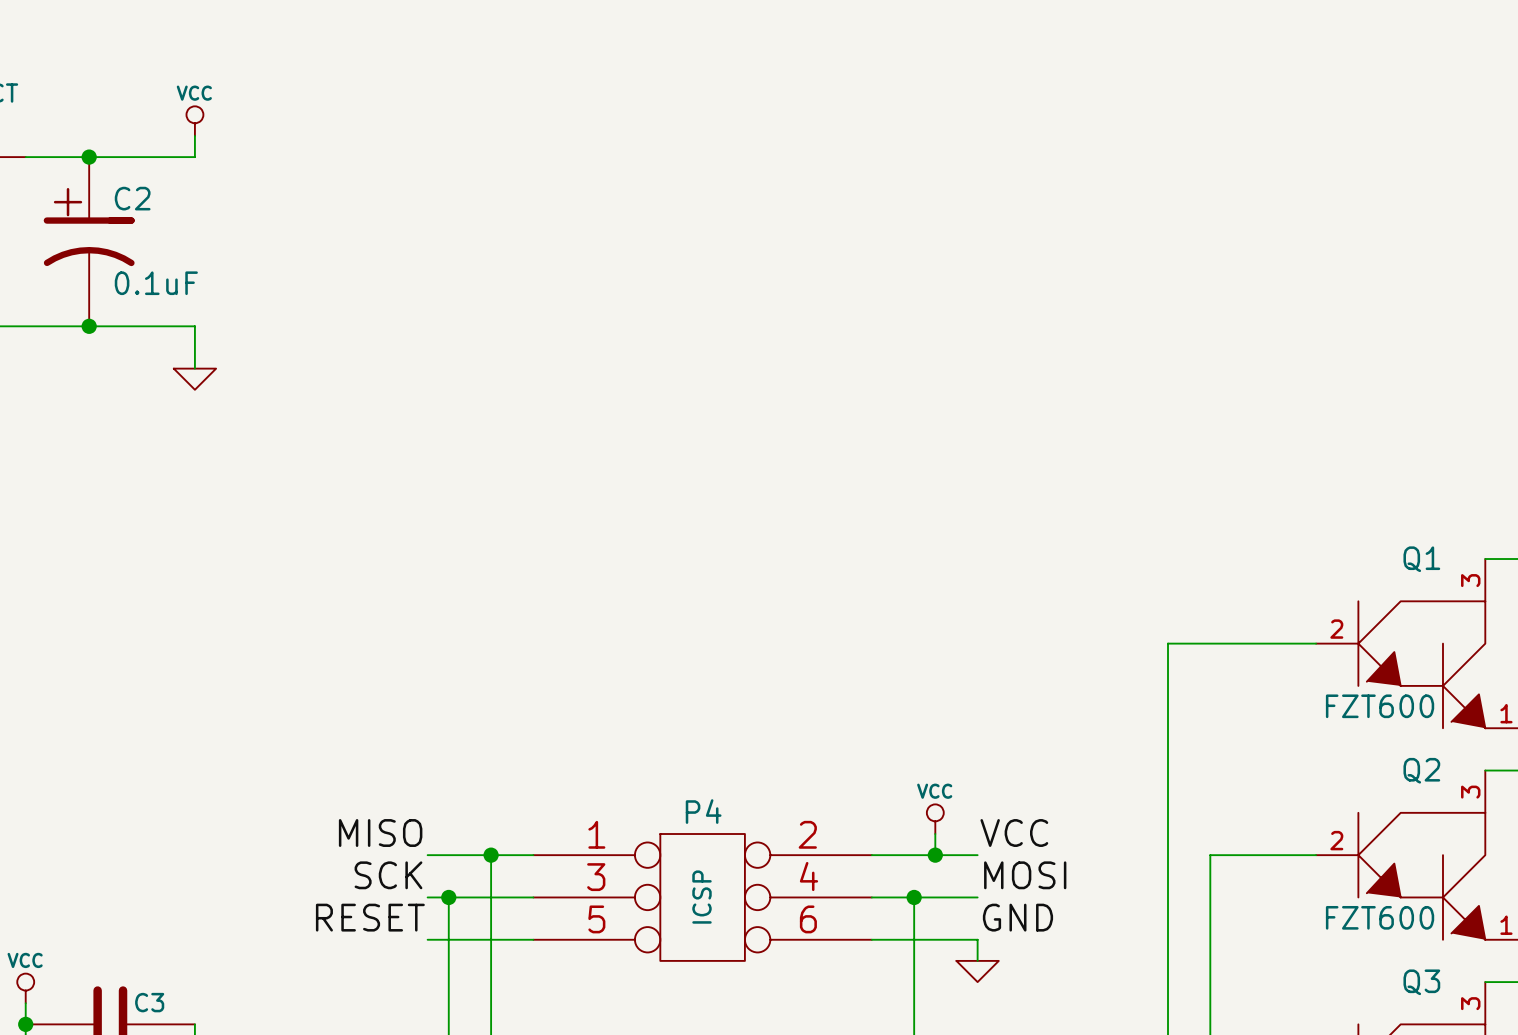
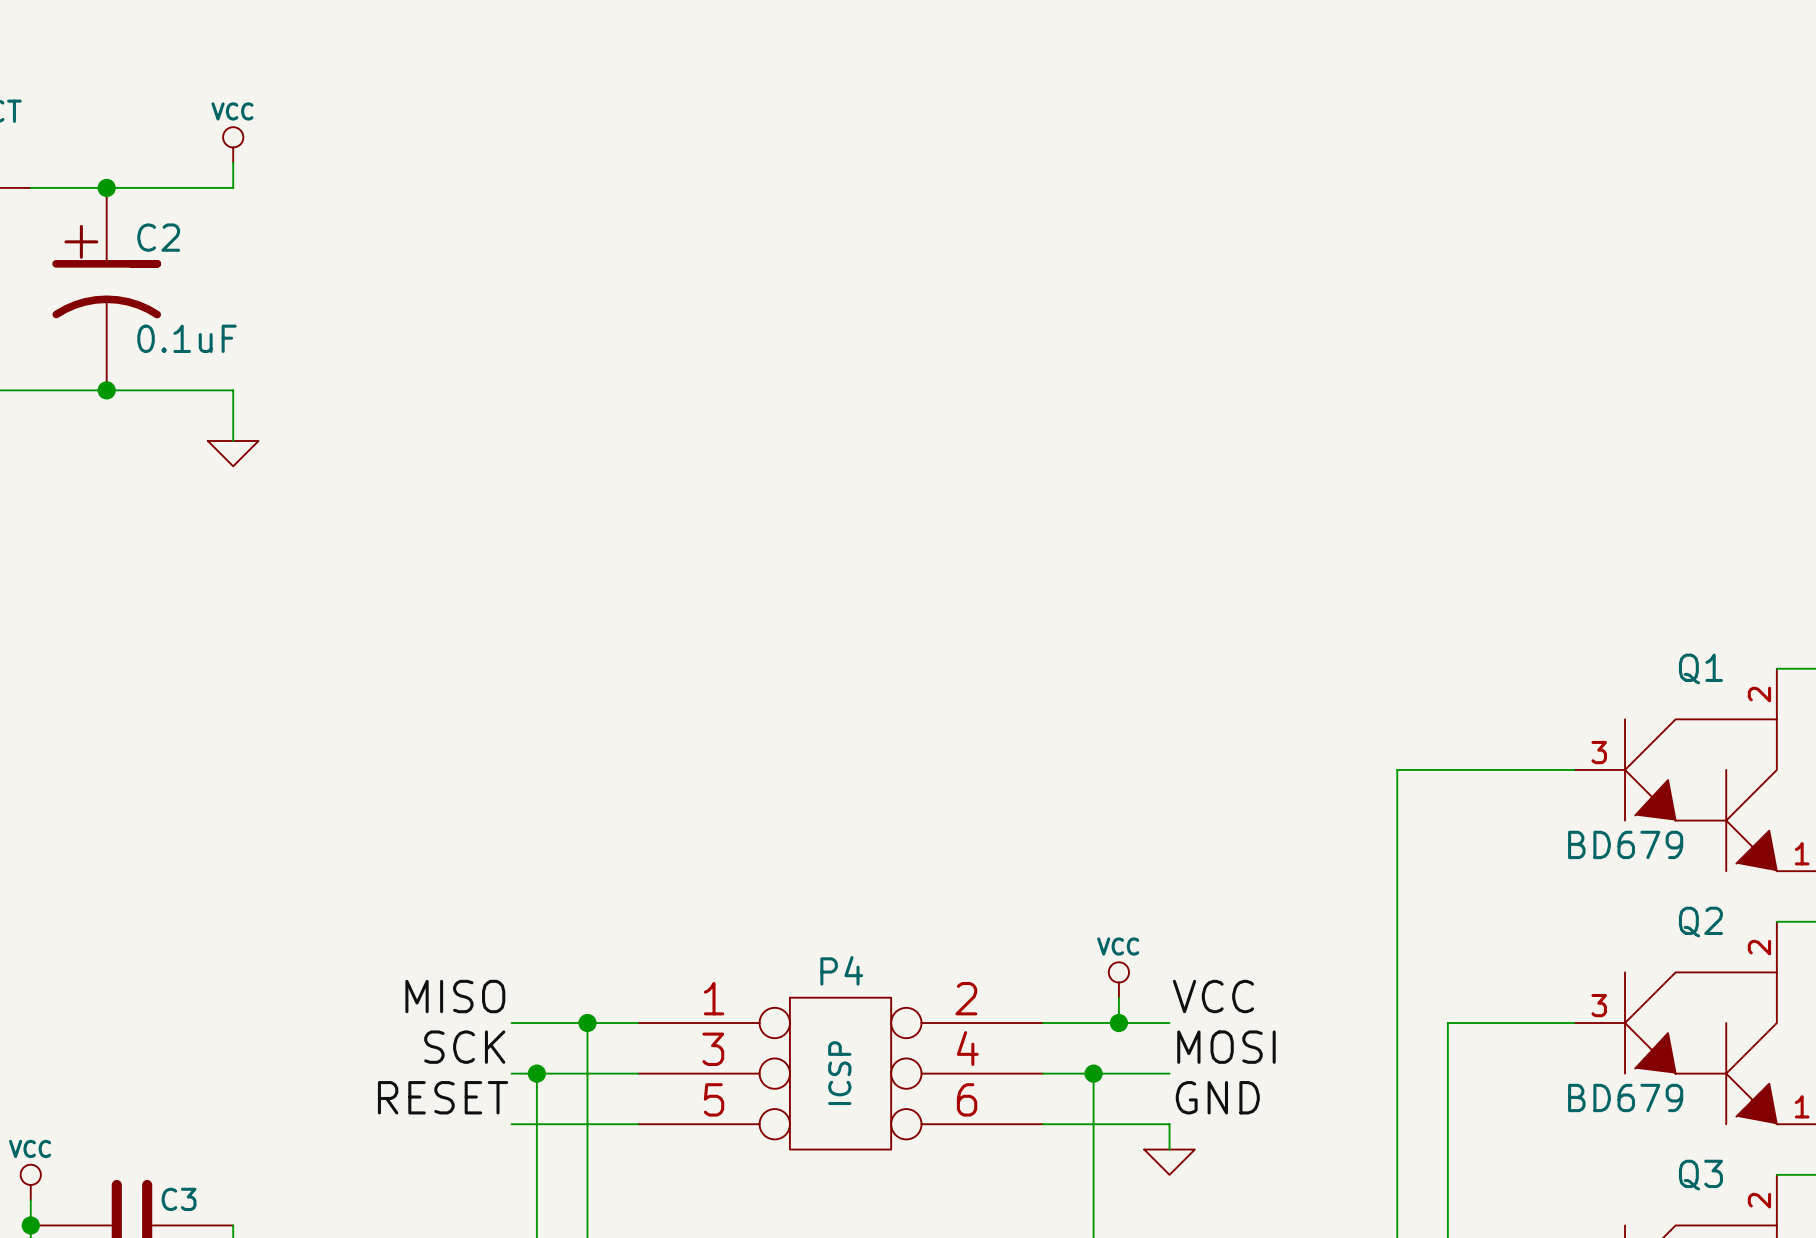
Q1 pin number: 3 (1470, 580) -> 2 (1759, 694)
Q1 pin number: 2 (1336, 629) -> 3 (1599, 752)
Q1 value: FZT600 (1380, 706) -> BD679 (1625, 844)
Q2 pin number: 3 (1470, 792) -> 2 (1759, 947)
Q2 pin number: 2 (1336, 840) -> 3 (1599, 1005)
Q2 value: FZT600 (1380, 917) -> BD679 (1625, 1097)
Q3 pin number: 3 (1470, 1003) -> 2 (1759, 1200)

